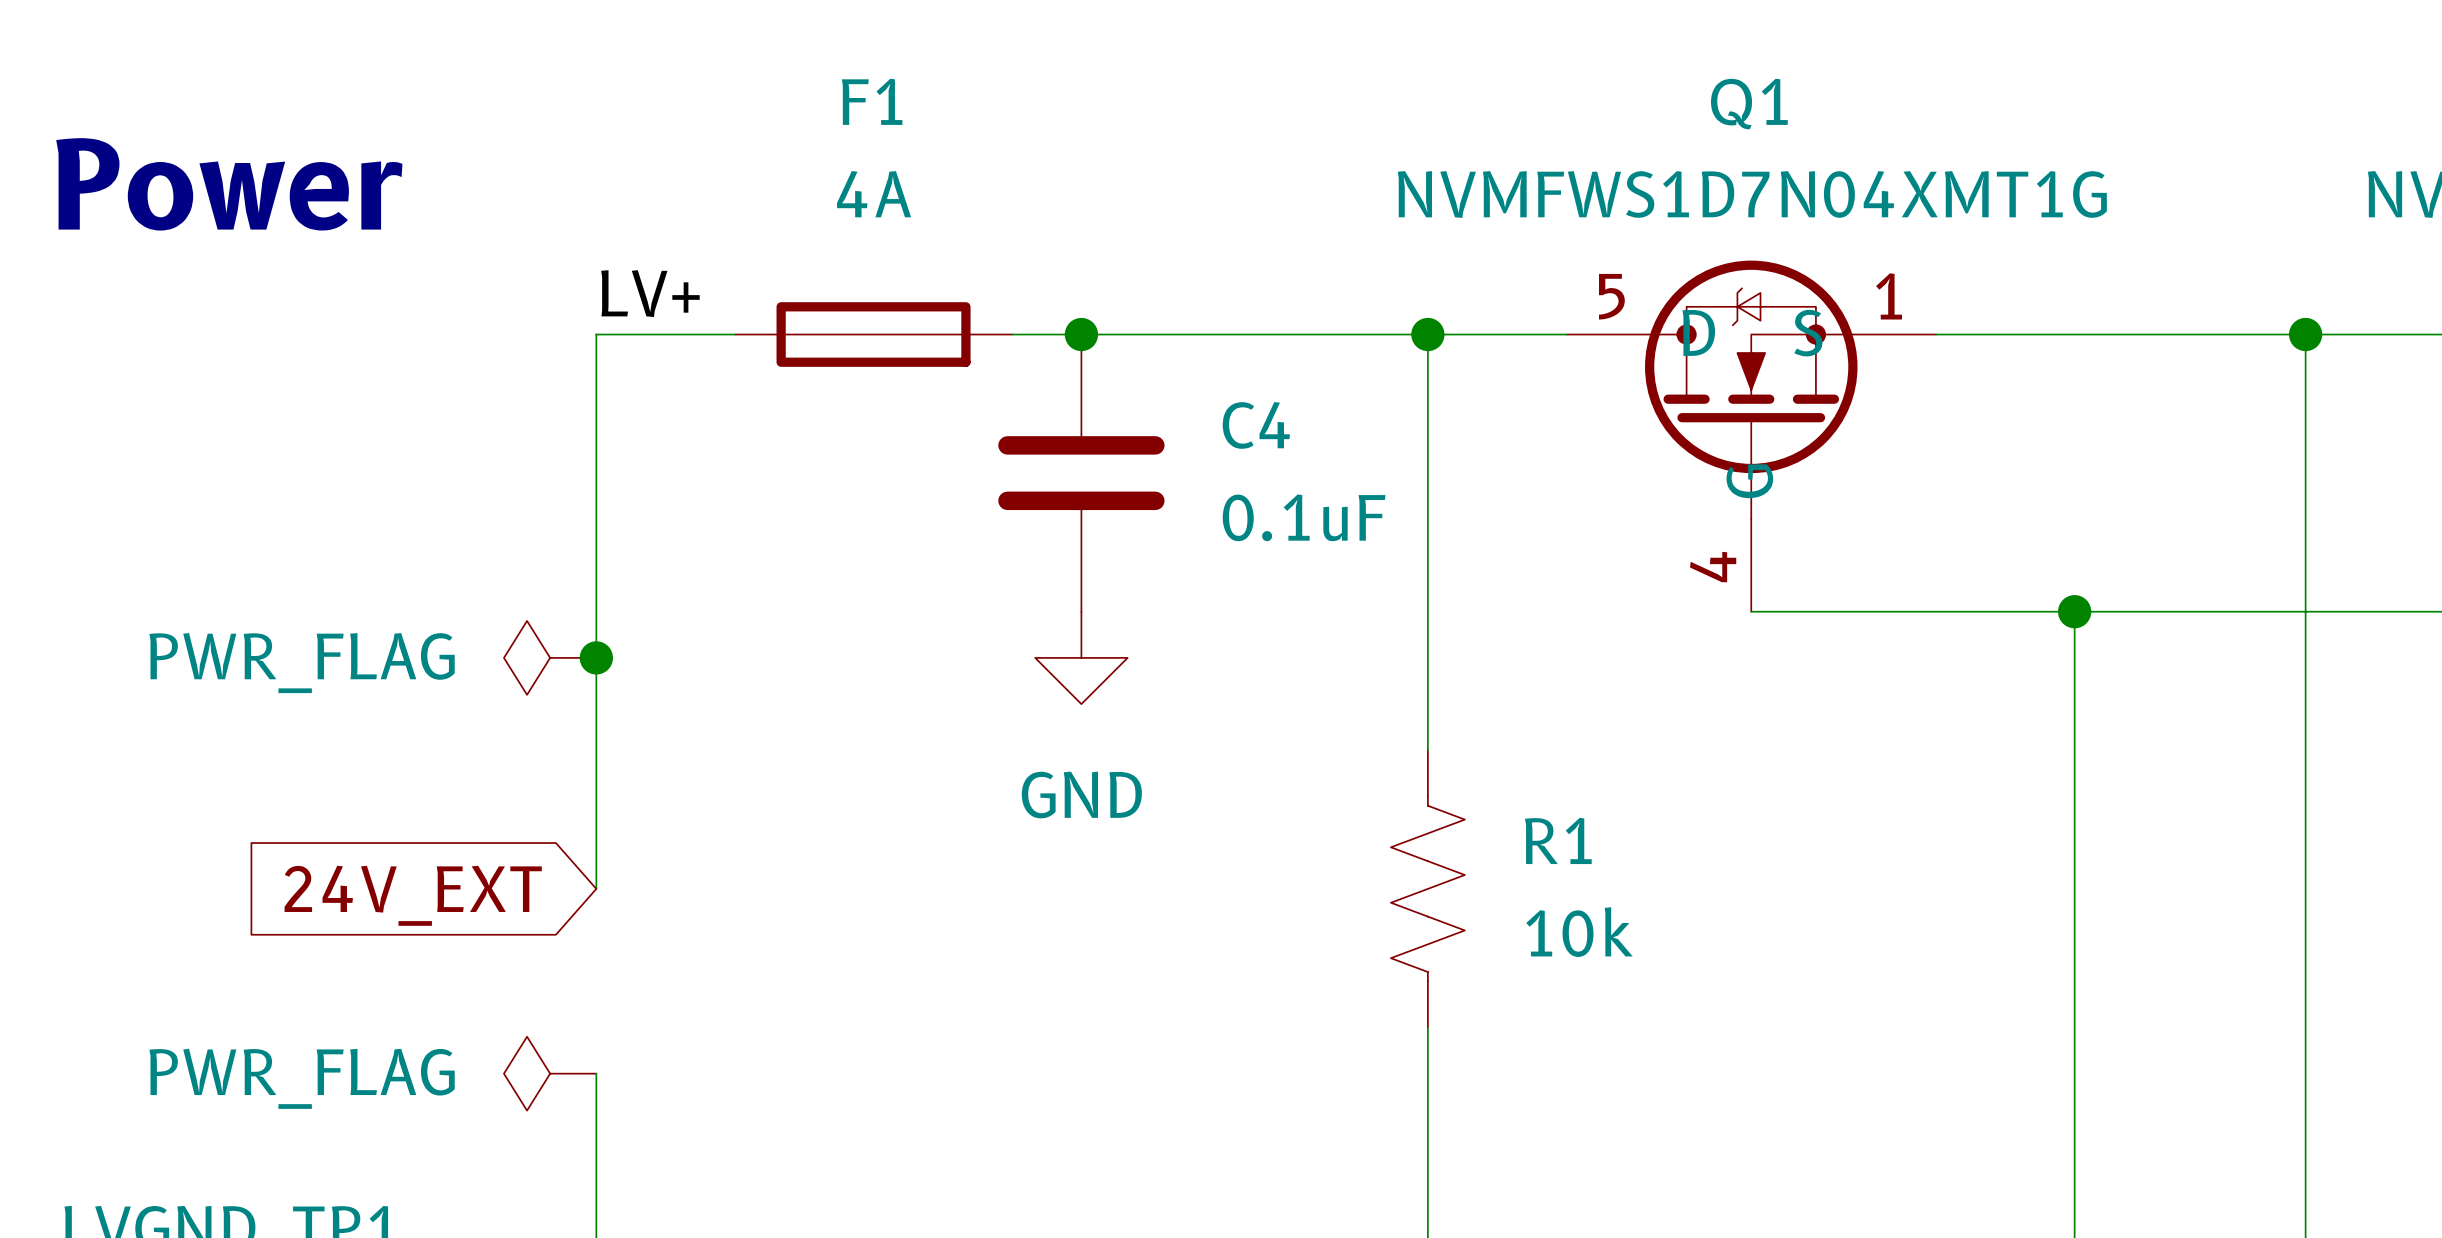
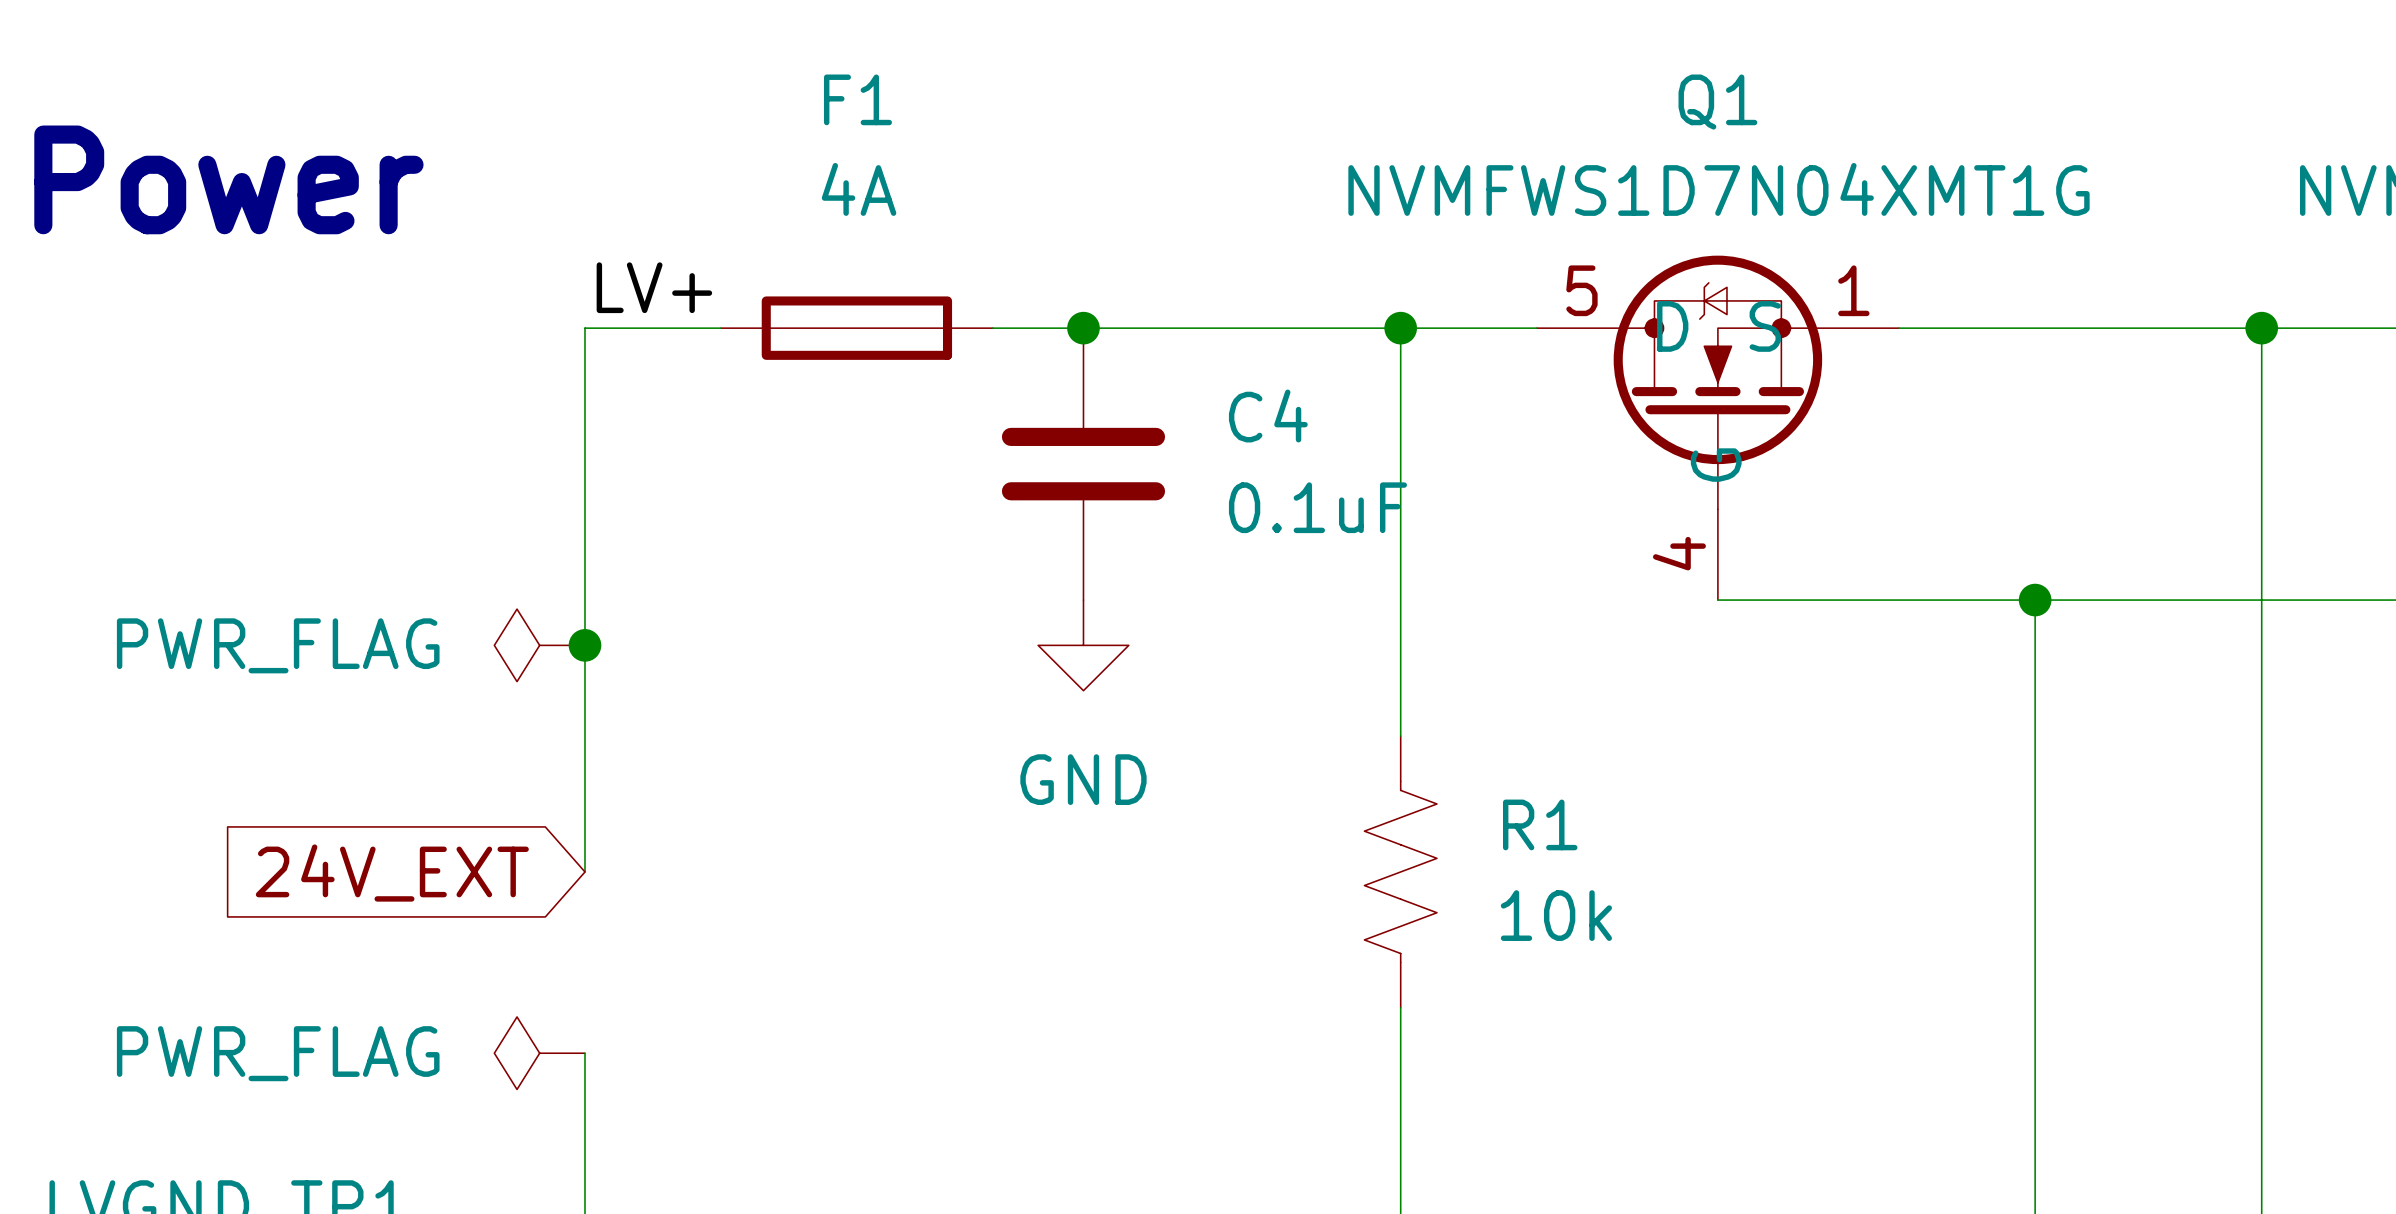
junction position: (1081, 334) -> (1083, 328)
C4 position: (1081, 473) -> (1083, 464)
power symbol position: GND (1081, 657) -> GND (1083, 645)

